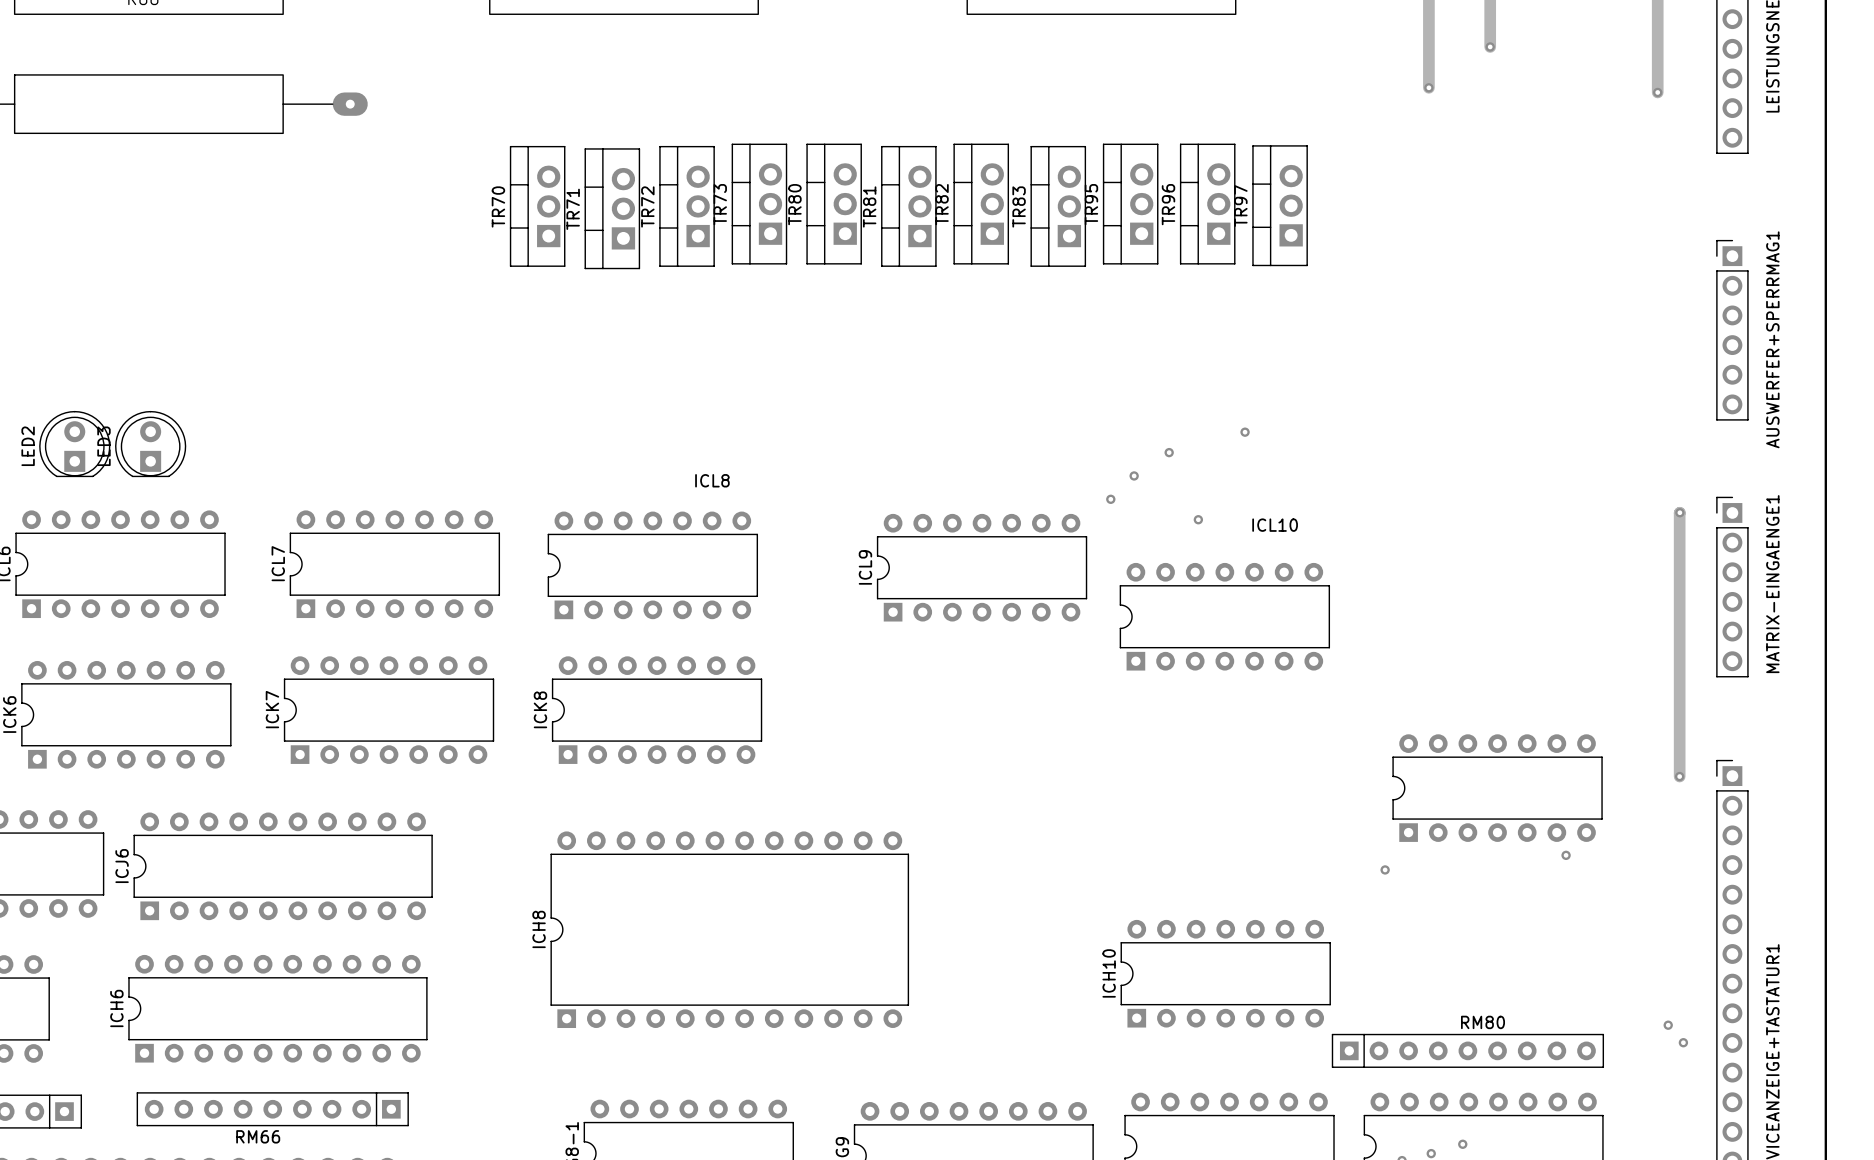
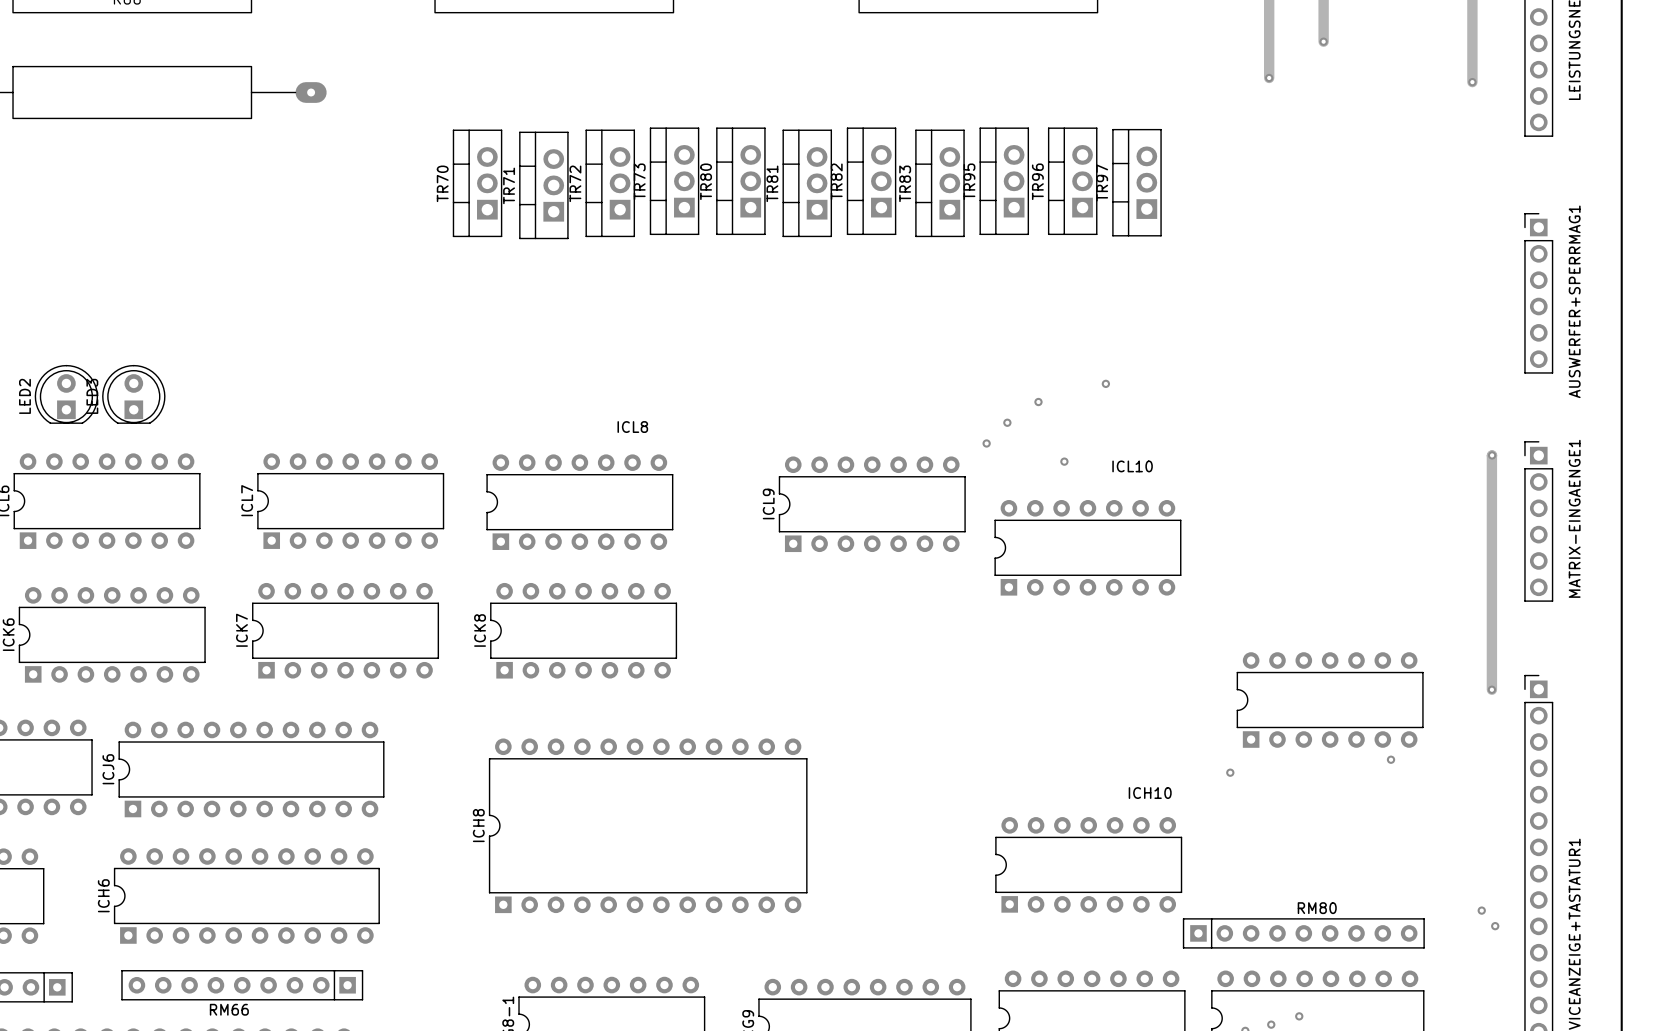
ICH10 name rotation: 0° (1109, 973) -> 90° clockwise (1150, 793)
ICH10 name position: ICH10 (1109, 973) -> ICH10 (1150, 793)

